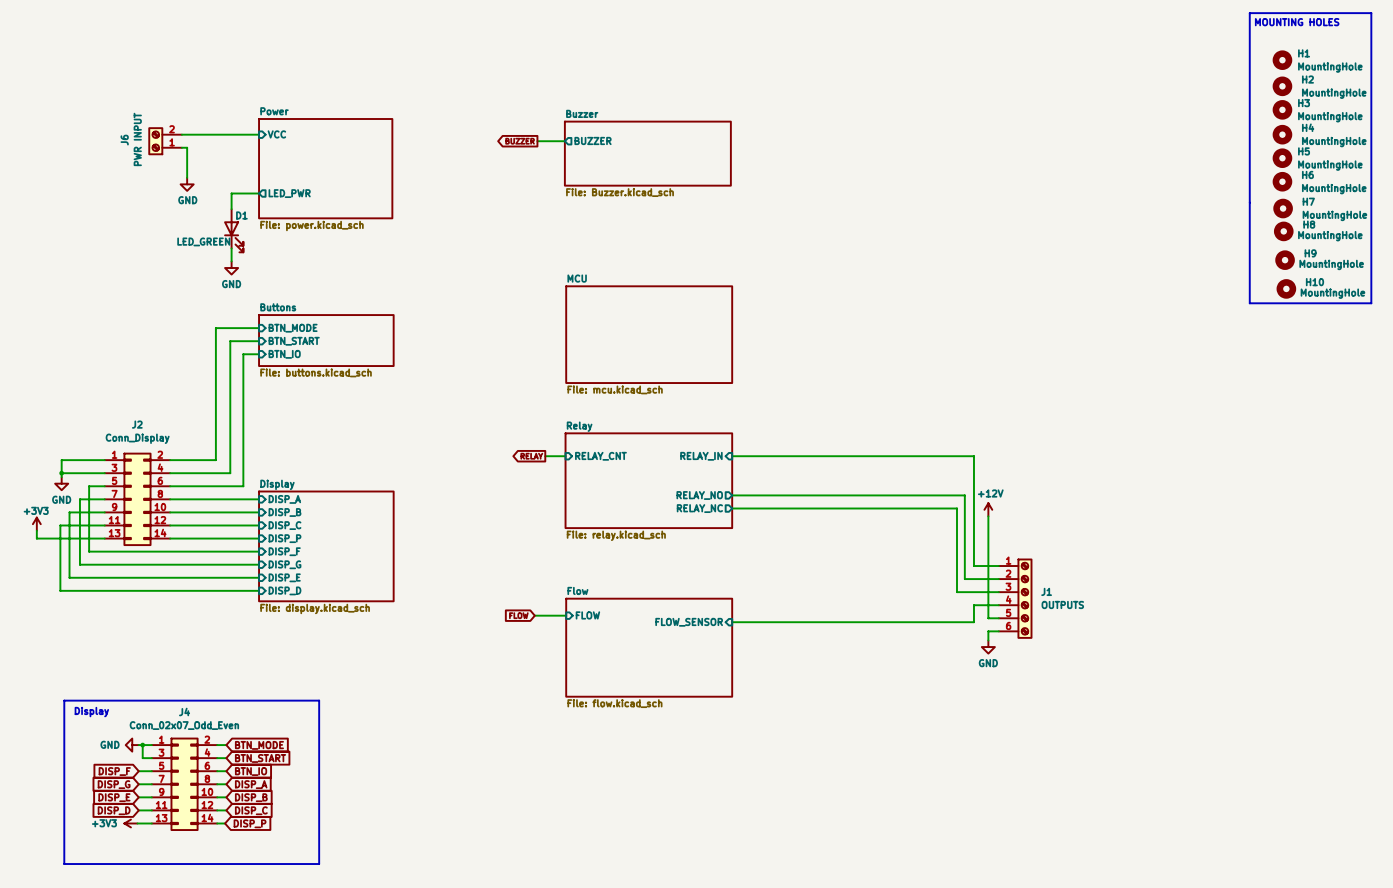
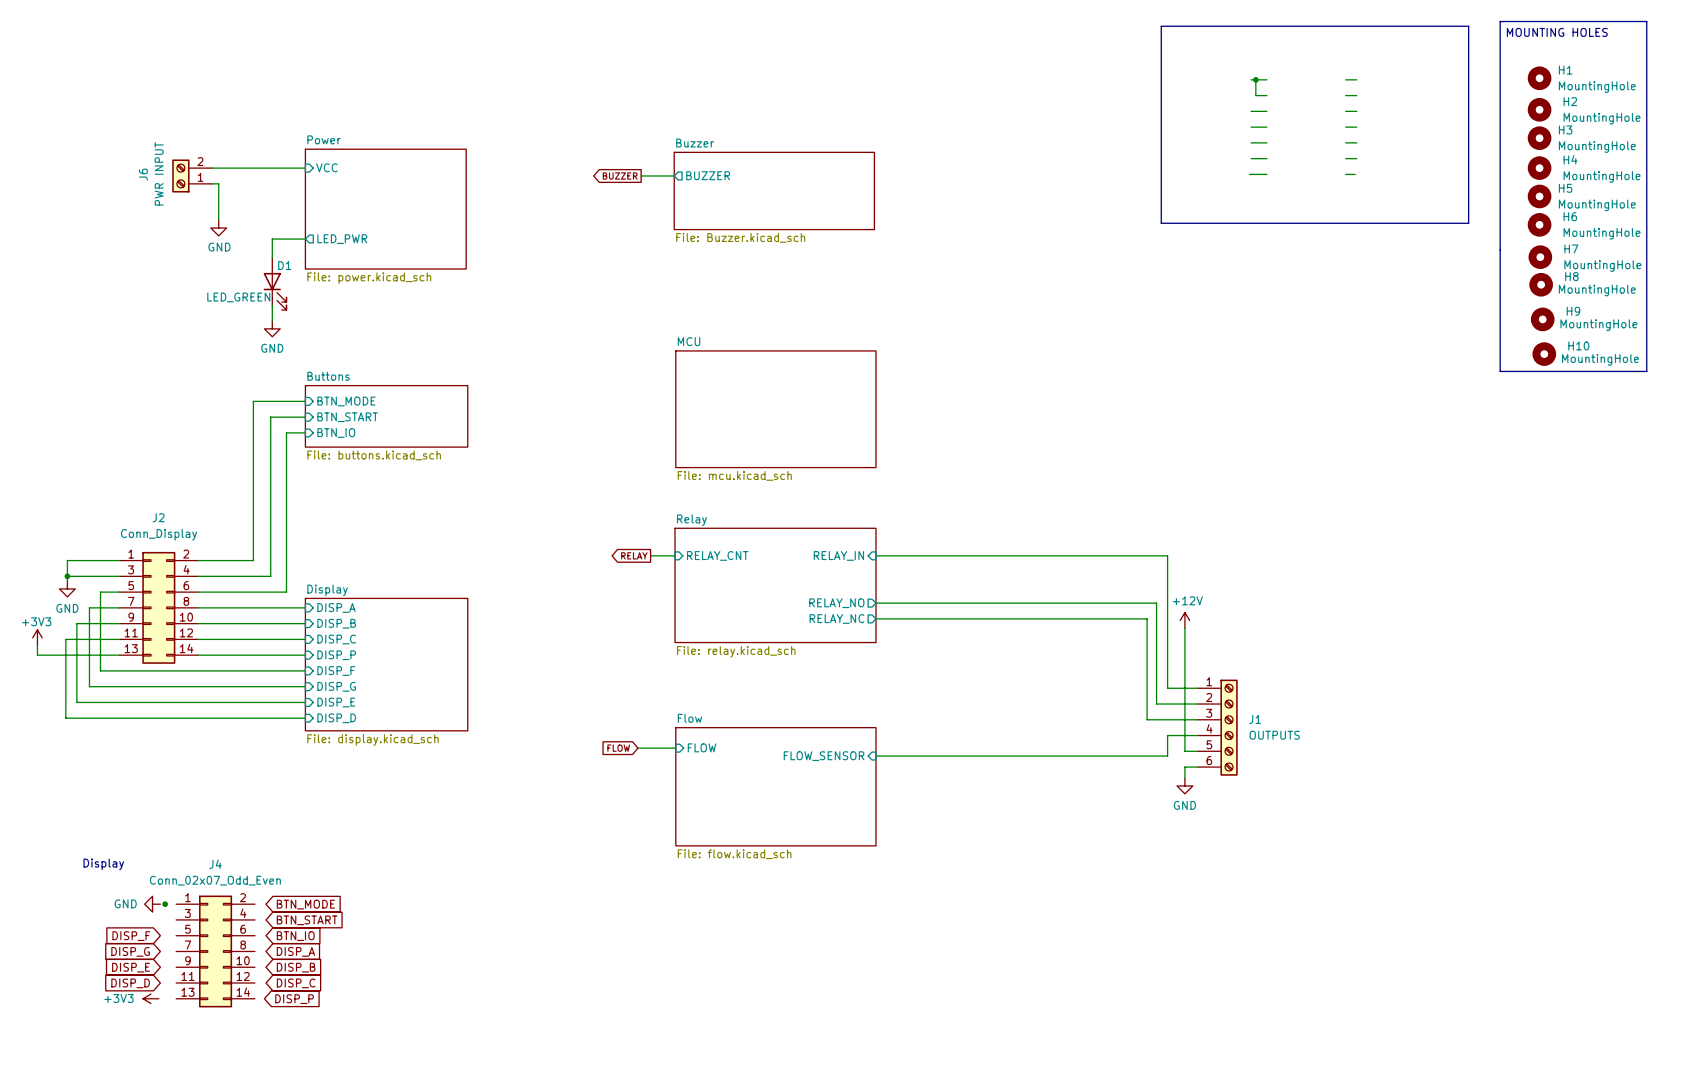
line: none -> (1161, 26) (1161, 223) (1468, 223) (1468, 26) (1161, 26)
wire: none -> (1251, 79) (1266, 79)
wire: none -> (1255, 79) (1255, 95) (1266, 95)
junction: none -> (1255, 79)
wire: none -> (1345, 79) (1356, 79)
wire: none -> (1345, 95) (1356, 95)
wire: none -> (1251, 111) (1266, 111)
wire: none -> (1345, 111) (1356, 111)
wire: none -> (1251, 127) (1266, 127)
wire: none -> (1345, 127) (1356, 127)
wire: none -> (1251, 142) (1266, 142)
wire: none -> (1345, 142) (1356, 142)
wire: none -> (1251, 158) (1266, 158)
wire: none -> (1345, 158) (1356, 158)
wire: none -> (1249, 174) (1266, 174)
wire: none -> (1345, 174) (1355, 174)
line: (64, 700) (64, 864) (319, 864) (319, 700) (64, 700) -> none
wire: (138, 745) (151, 745) -> none
wire: (142, 745) (142, 758) (151, 758) -> none
wire: (217, 745) (226, 745) -> none
wire: (217, 758) (226, 758) -> none
wire: (138, 771) (151, 771) -> none
wire: (217, 771) (226, 771) -> none
wire: (138, 784) (151, 784) -> none
wire: (217, 784) (226, 784) -> none
wire: (138, 797) (151, 797) -> none
wire: (217, 797) (226, 797) -> none
wire: (138, 810) (151, 810) -> none
wire: (217, 810) (226, 810) -> none
wire: (137, 823) (151, 823) -> none
wire: (217, 823) (225, 823) -> none

